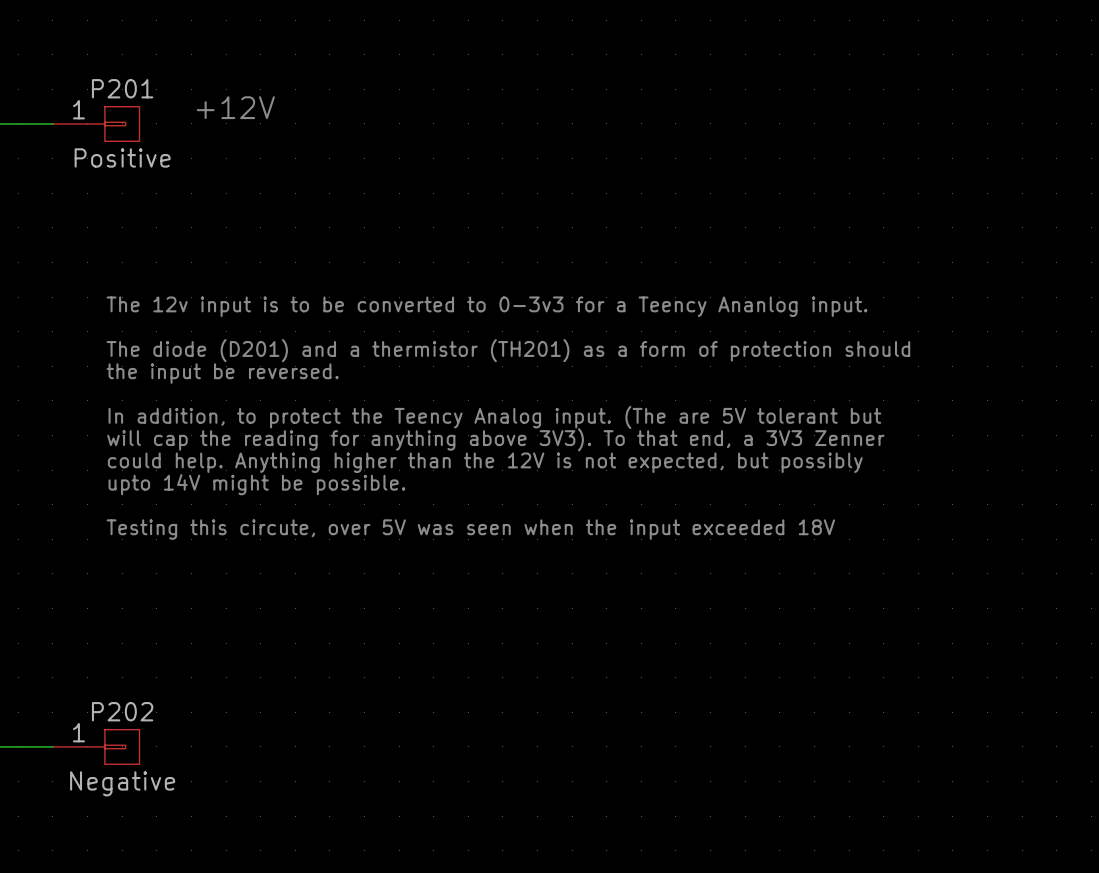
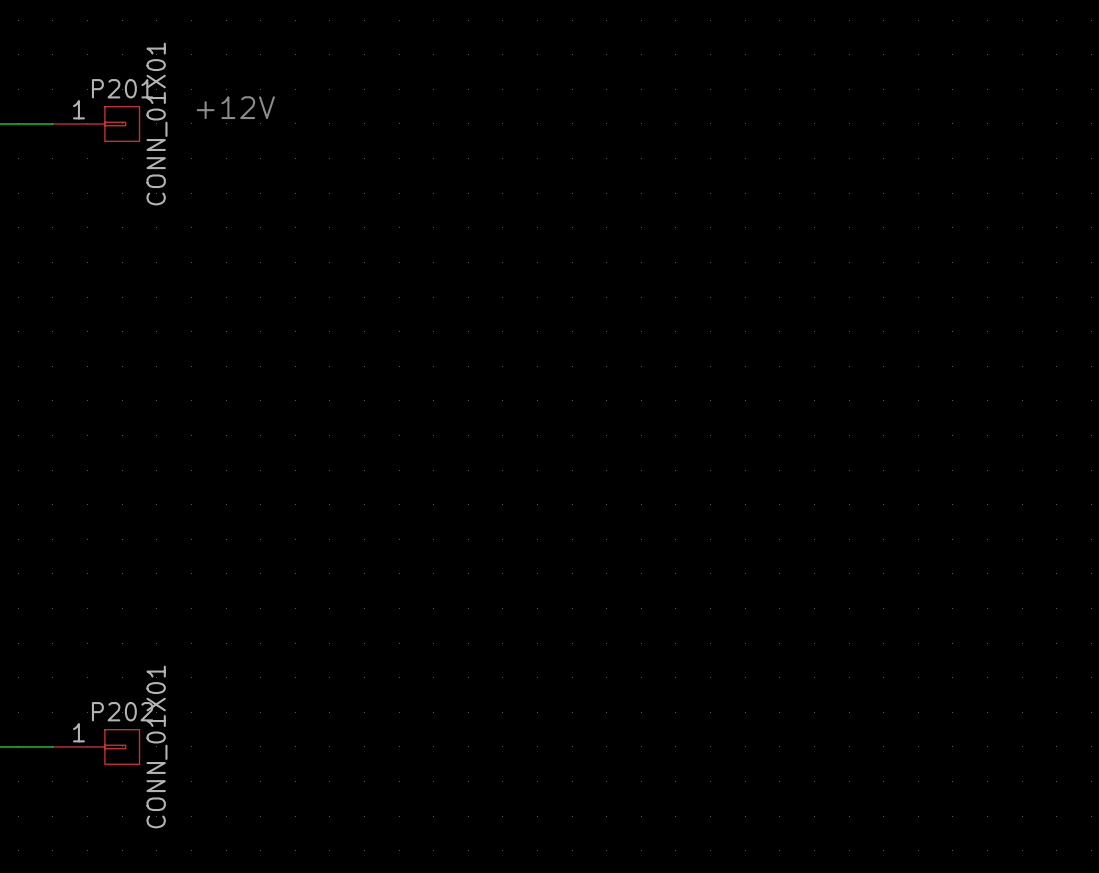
P201 value: Positive (122, 157) -> CONN_01X01 (156, 123)
text: The 12v input is to be converted to 0-3v3 for a Teency Ananlog input. (486, 306) -> none
text: The diode (D201) and a thermistor (TH201) as a form of protection should (508, 350) -> none
text: the input be reversed. (222, 373) -> none
text: In addition, to protect the Teency Analog input. (The are 5V tolerant but (494, 417) -> none
text: will cap the reading for anything above 3V3). To that end, a 3V3 Zenner (495, 439) -> none
text: could help. Anything higher than the 12V is not expected, but possibly (485, 462) -> none
text: upto 14V might be possible. (256, 484) -> none
text: Testing this circute, over 5V was seen when the input exceeded 18V (470, 529) -> none
P202 value: Negative (122, 783) -> CONN_01X01 (156, 746)

